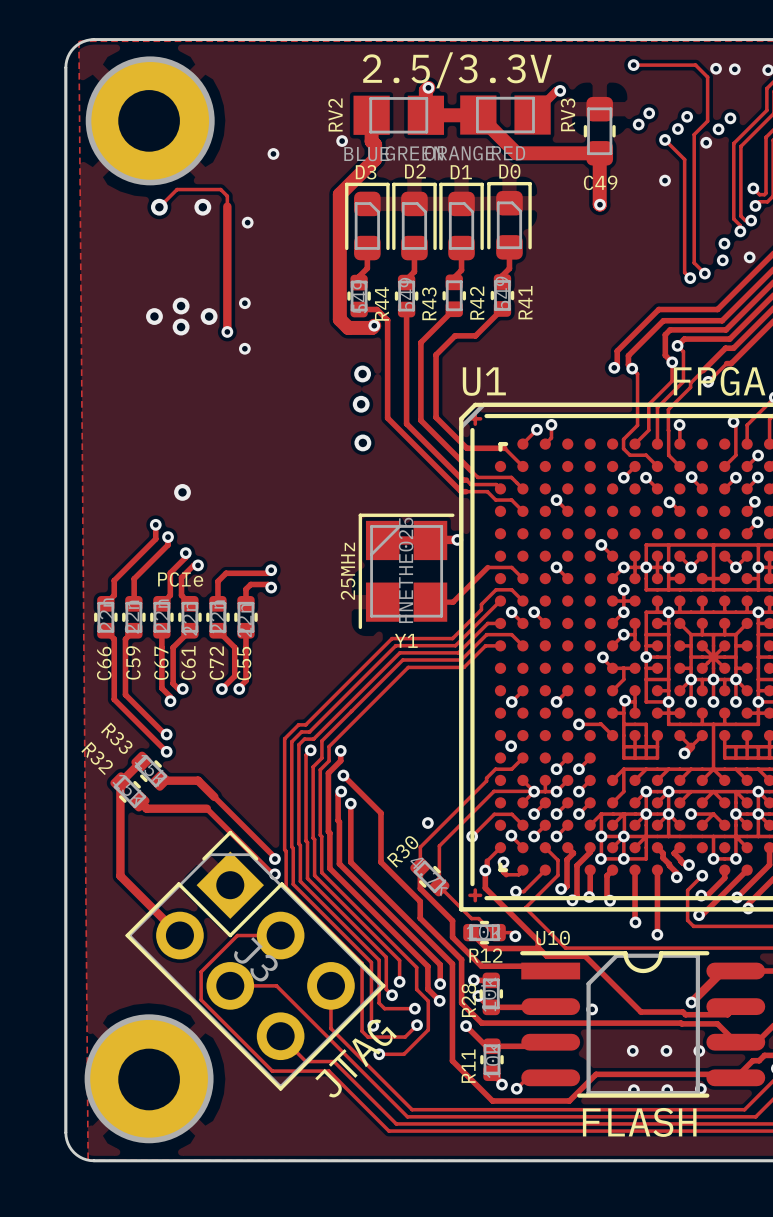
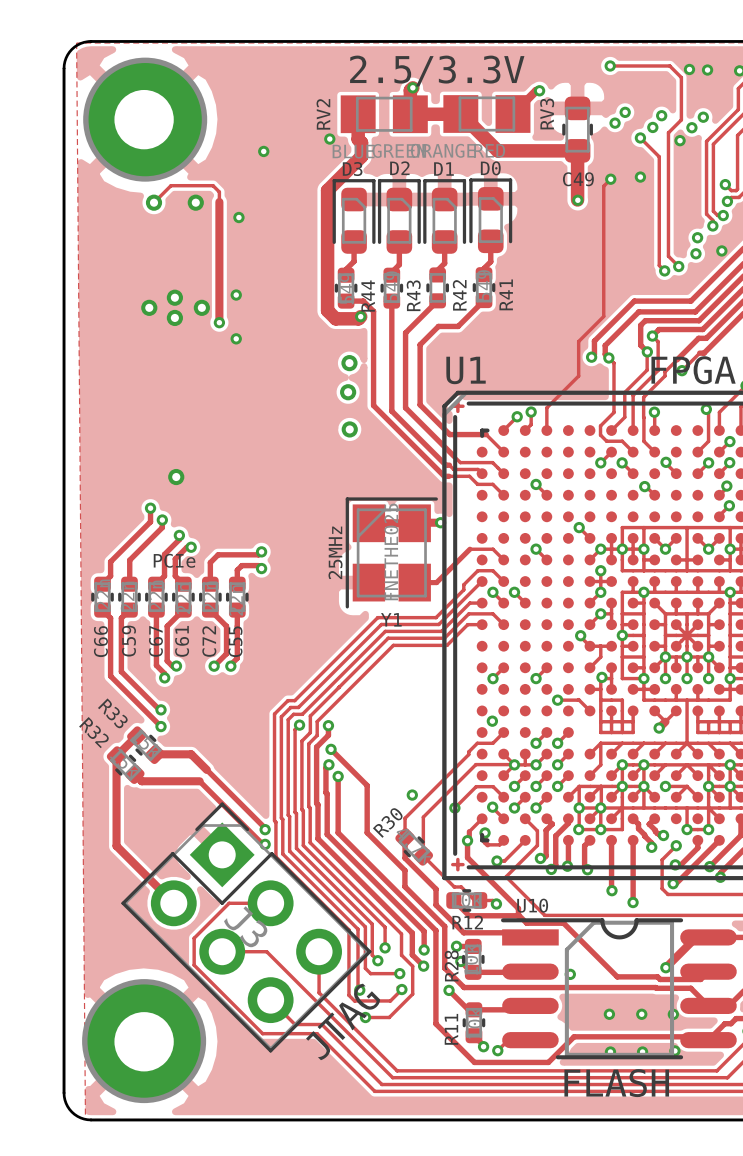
track: none -> (610, 179) (603, 186) (603, 316) (578, 341) (578, 376) (546, 407) (546, 430)
via: none -> (610, 179)

